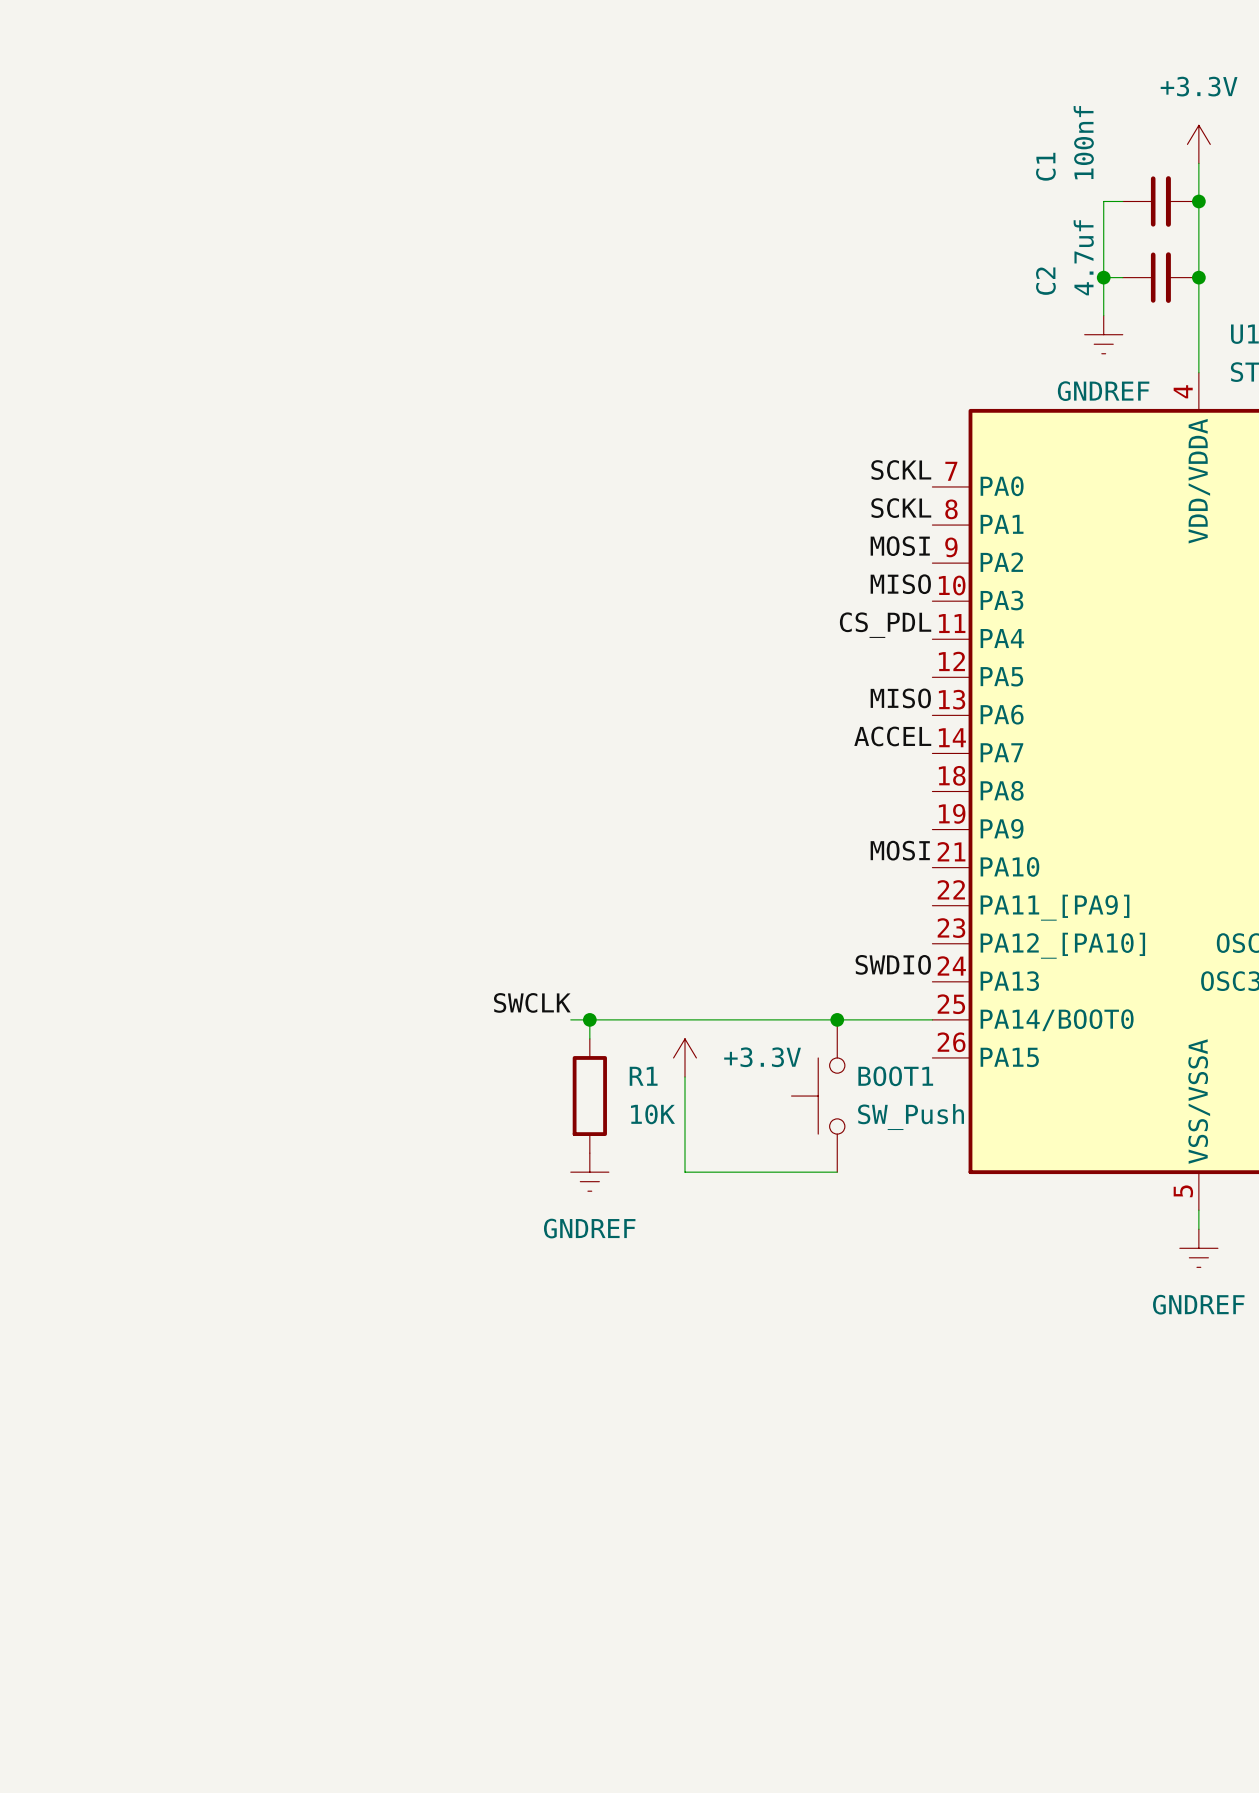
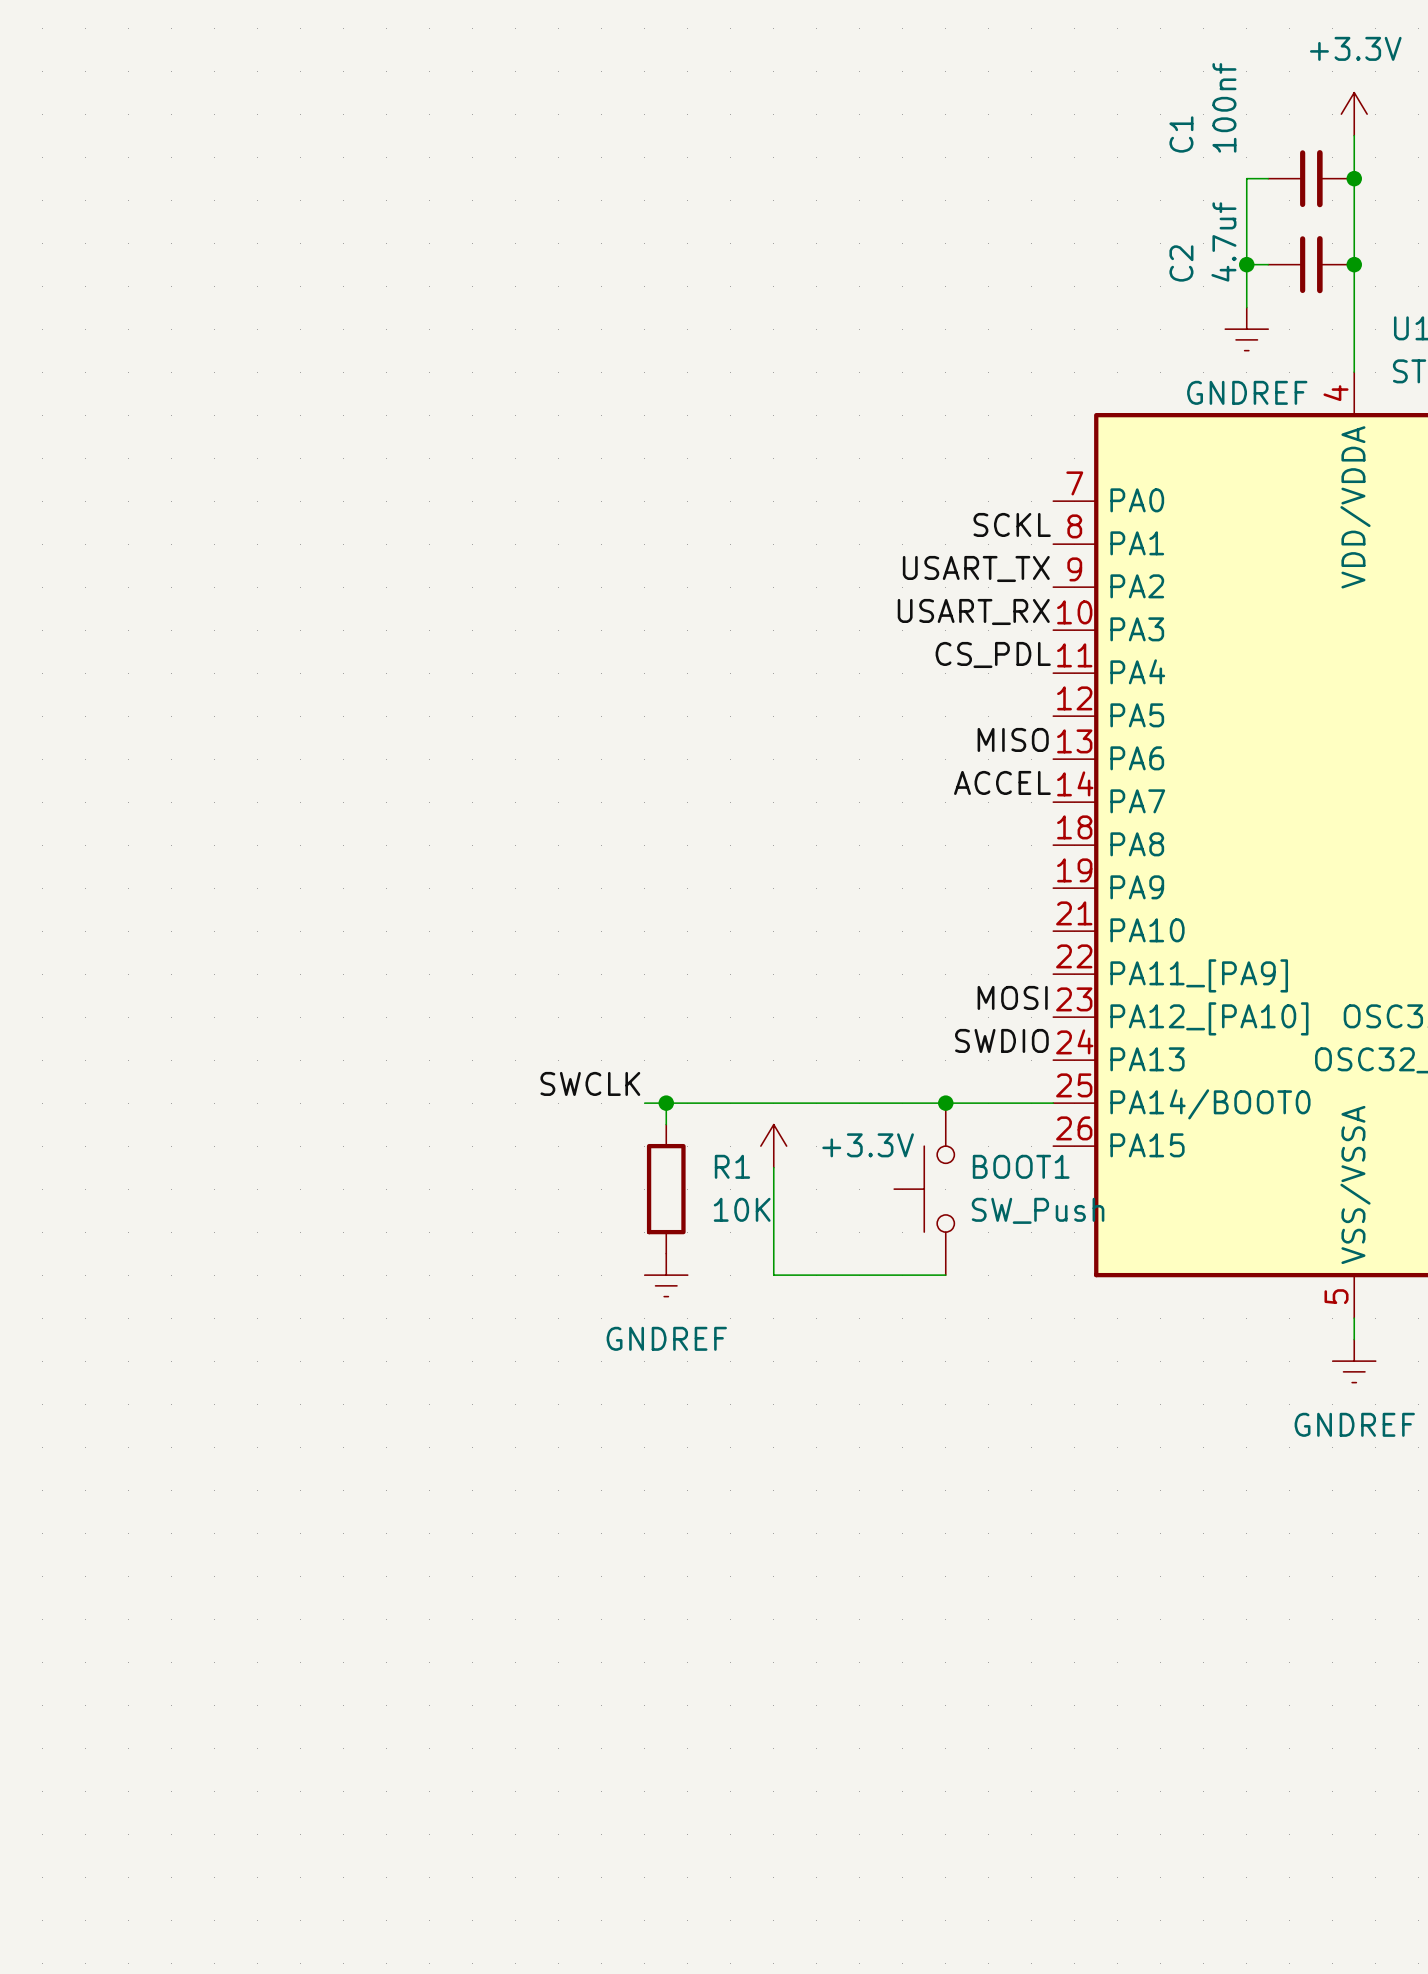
label: SCKL (901, 470) -> none
label: MOSI (900, 546) -> USART_TX (976, 568)
label: MISO (900, 584) -> USART_RX (973, 611)
label position: MOSI (900, 850) -> MOSI (1012, 997)

